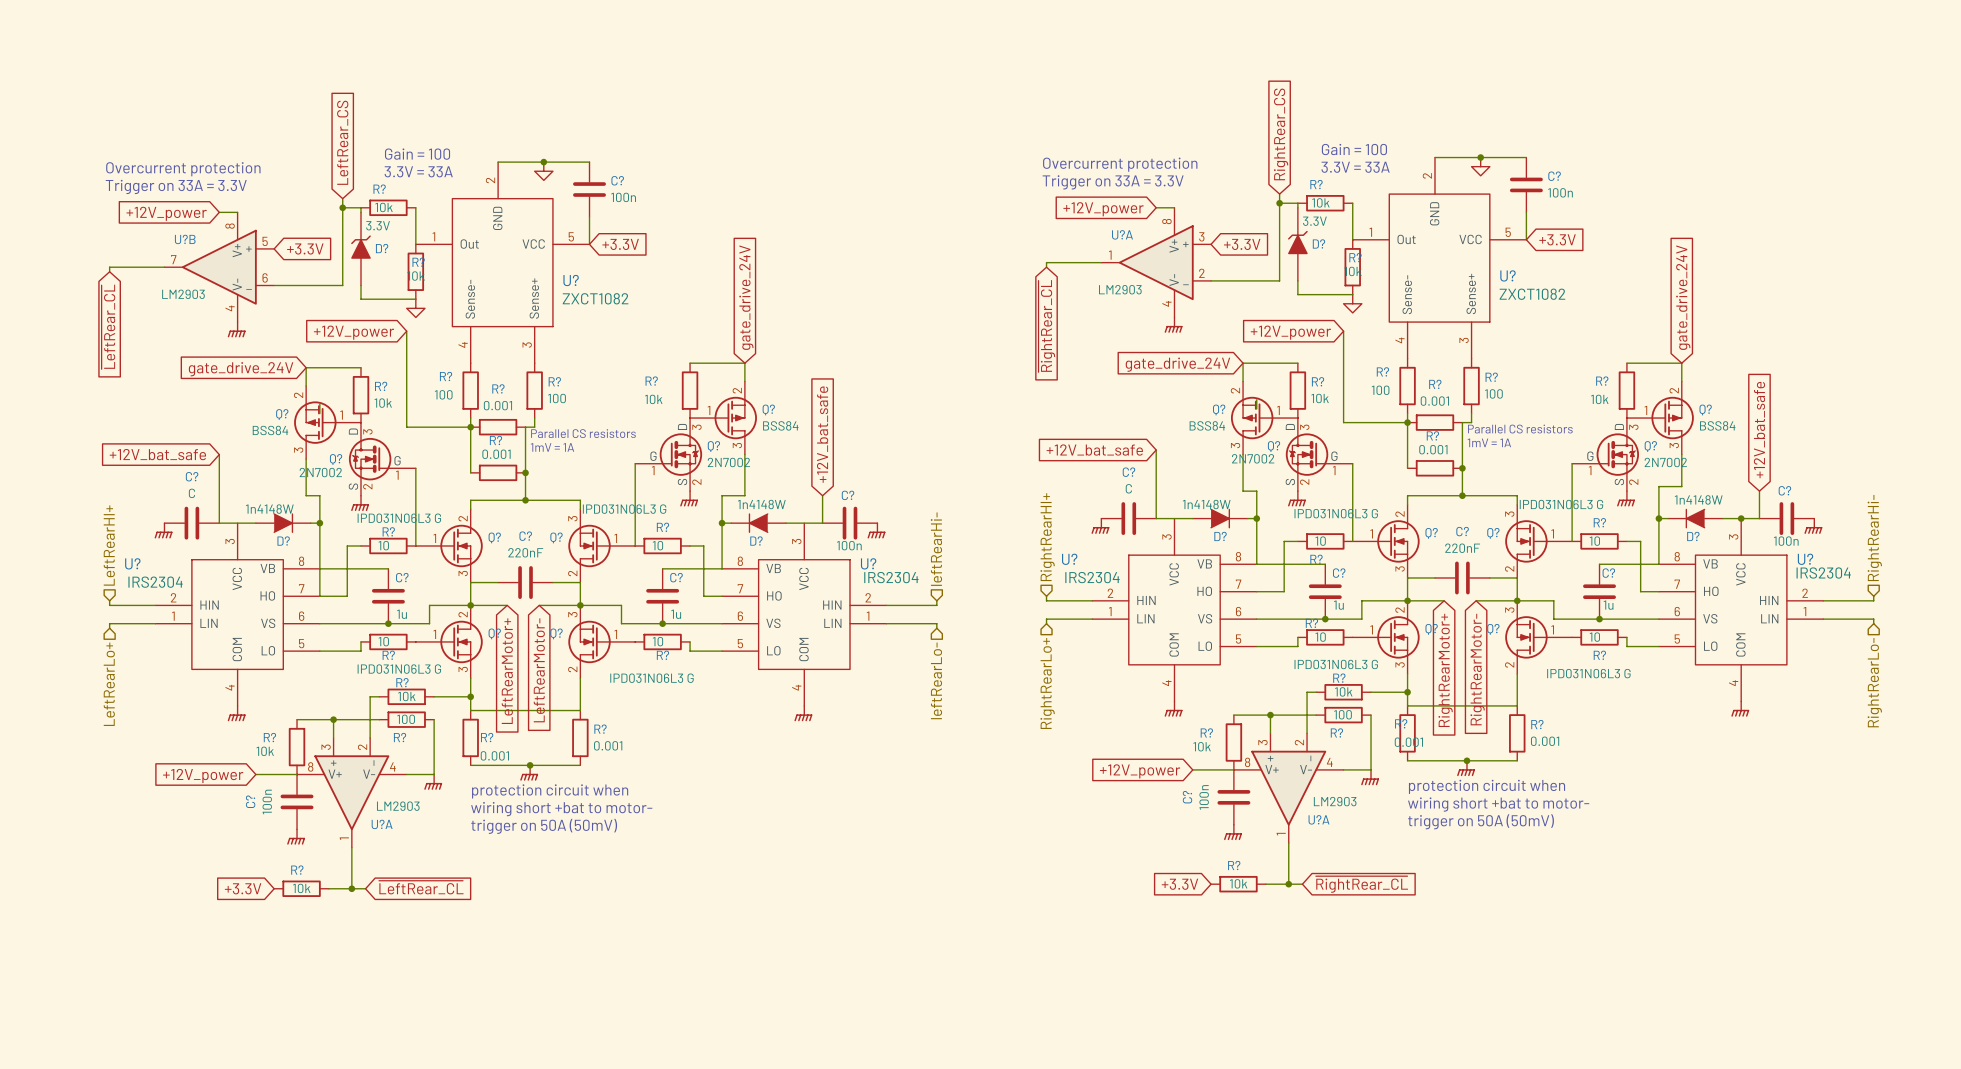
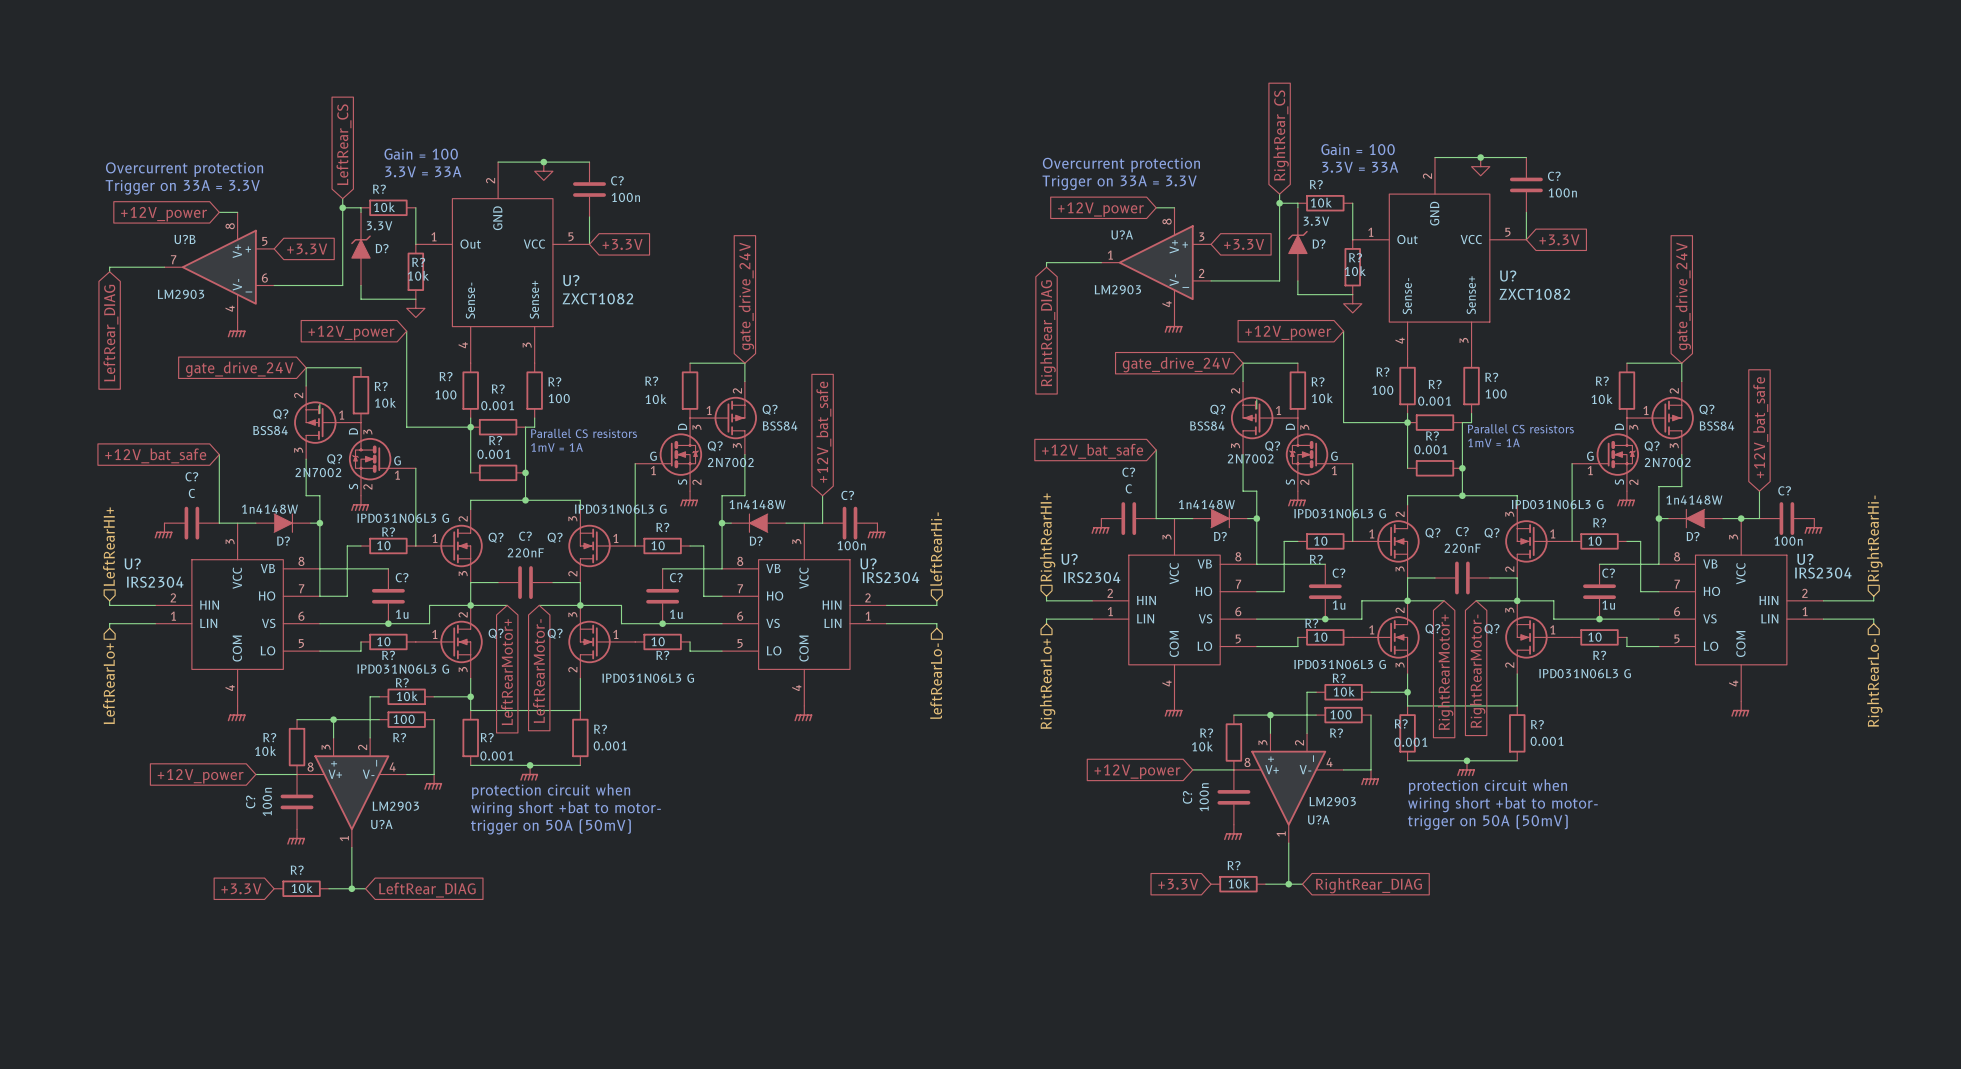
global label: ~{LeftRear_CL} (108, 326) -> LeftRear_DIAG (110, 333)
global label: ~{RightRear_CL} (1046, 326) -> RightRear_DIAG (1048, 333)
global label: ~{RightRear_CL} (1361, 884) -> RightRear_DIAG (1368, 885)
global label: ~{LeftRear_CL} (421, 887) -> LeftRear_DIAG (427, 890)

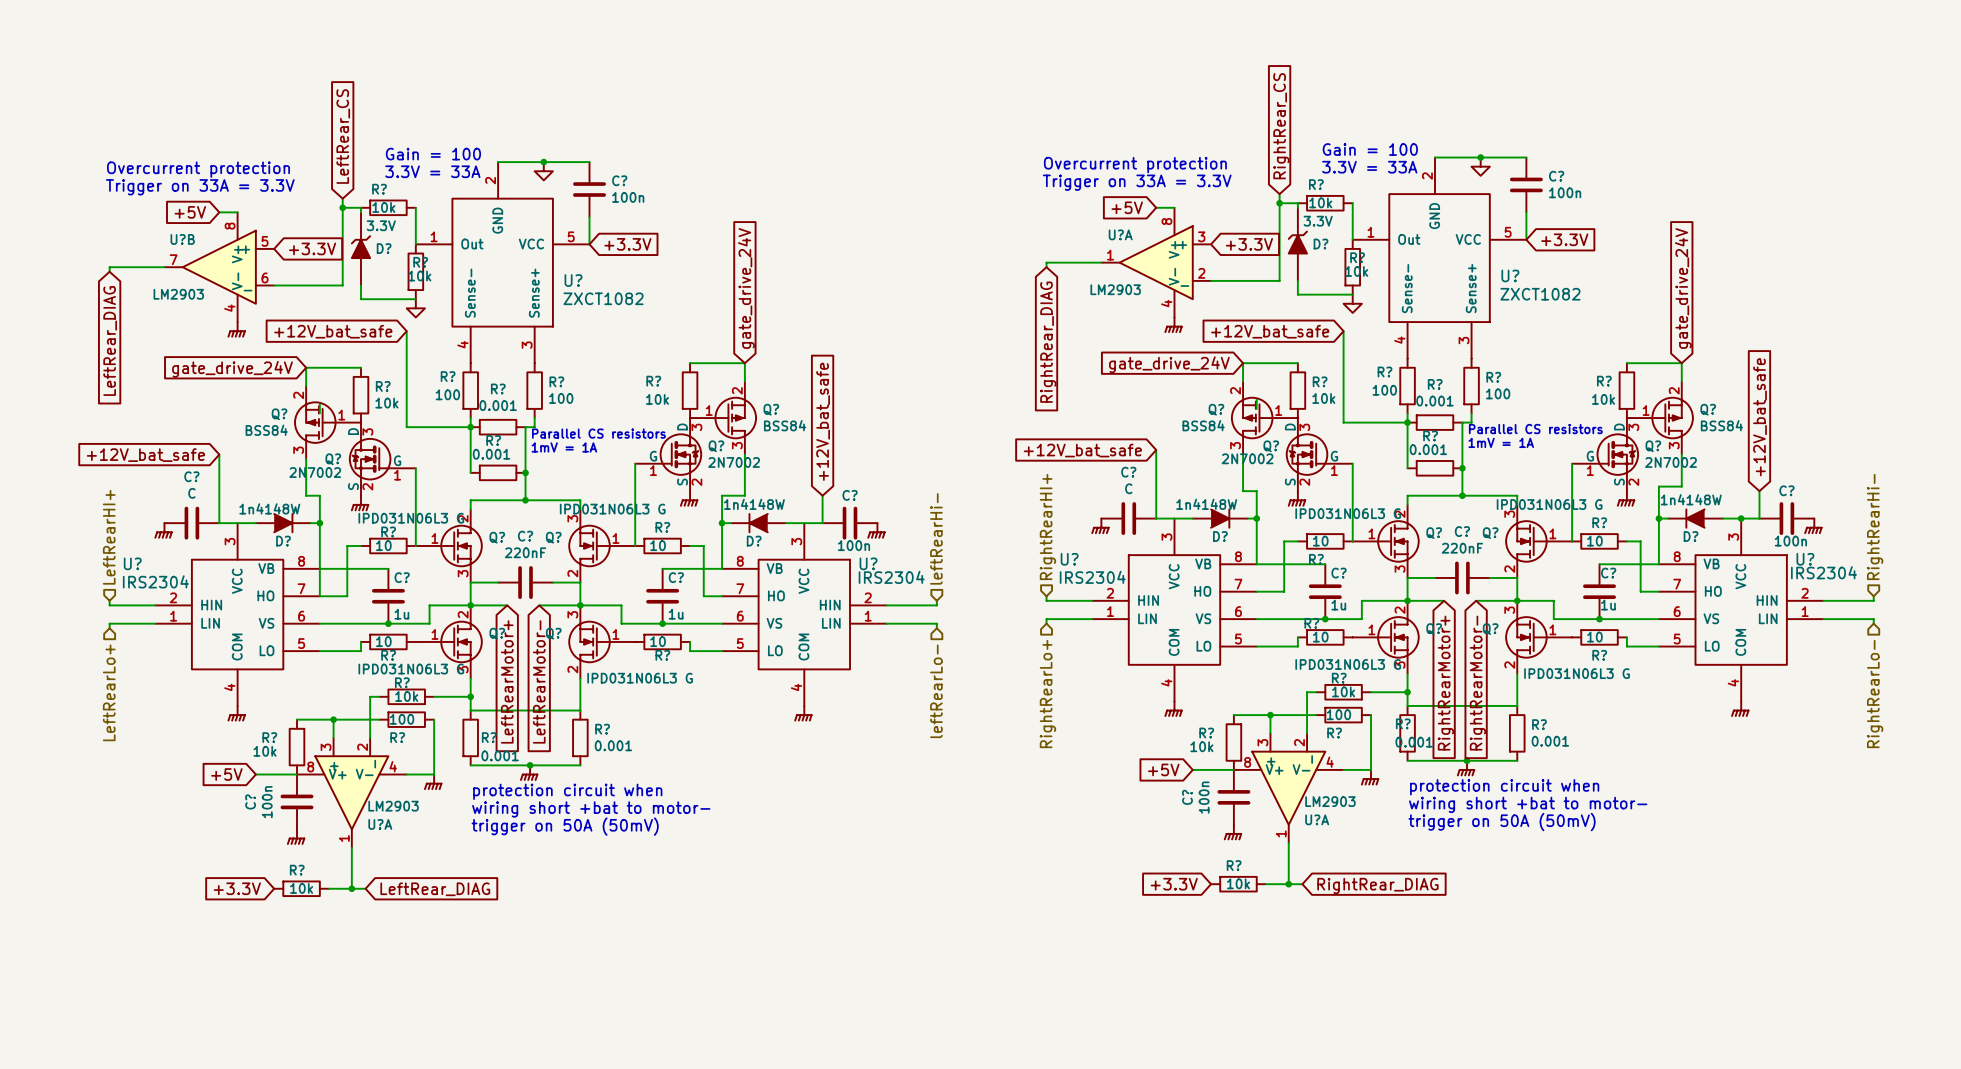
global label: +12V_power (1100, 209) -> +5V (1127, 207)
global label: +12V_power (164, 214) -> +5V (190, 212)
global label: +12V_power (351, 333) -> +12V_bat_safe (333, 331)
global label: +12V_power (1288, 333) -> +12V_bat_safe (1270, 331)
global label: +12V_power (1137, 771) -> +5V (1163, 769)
global label: +12V_power (200, 776) -> +5V (226, 774)

